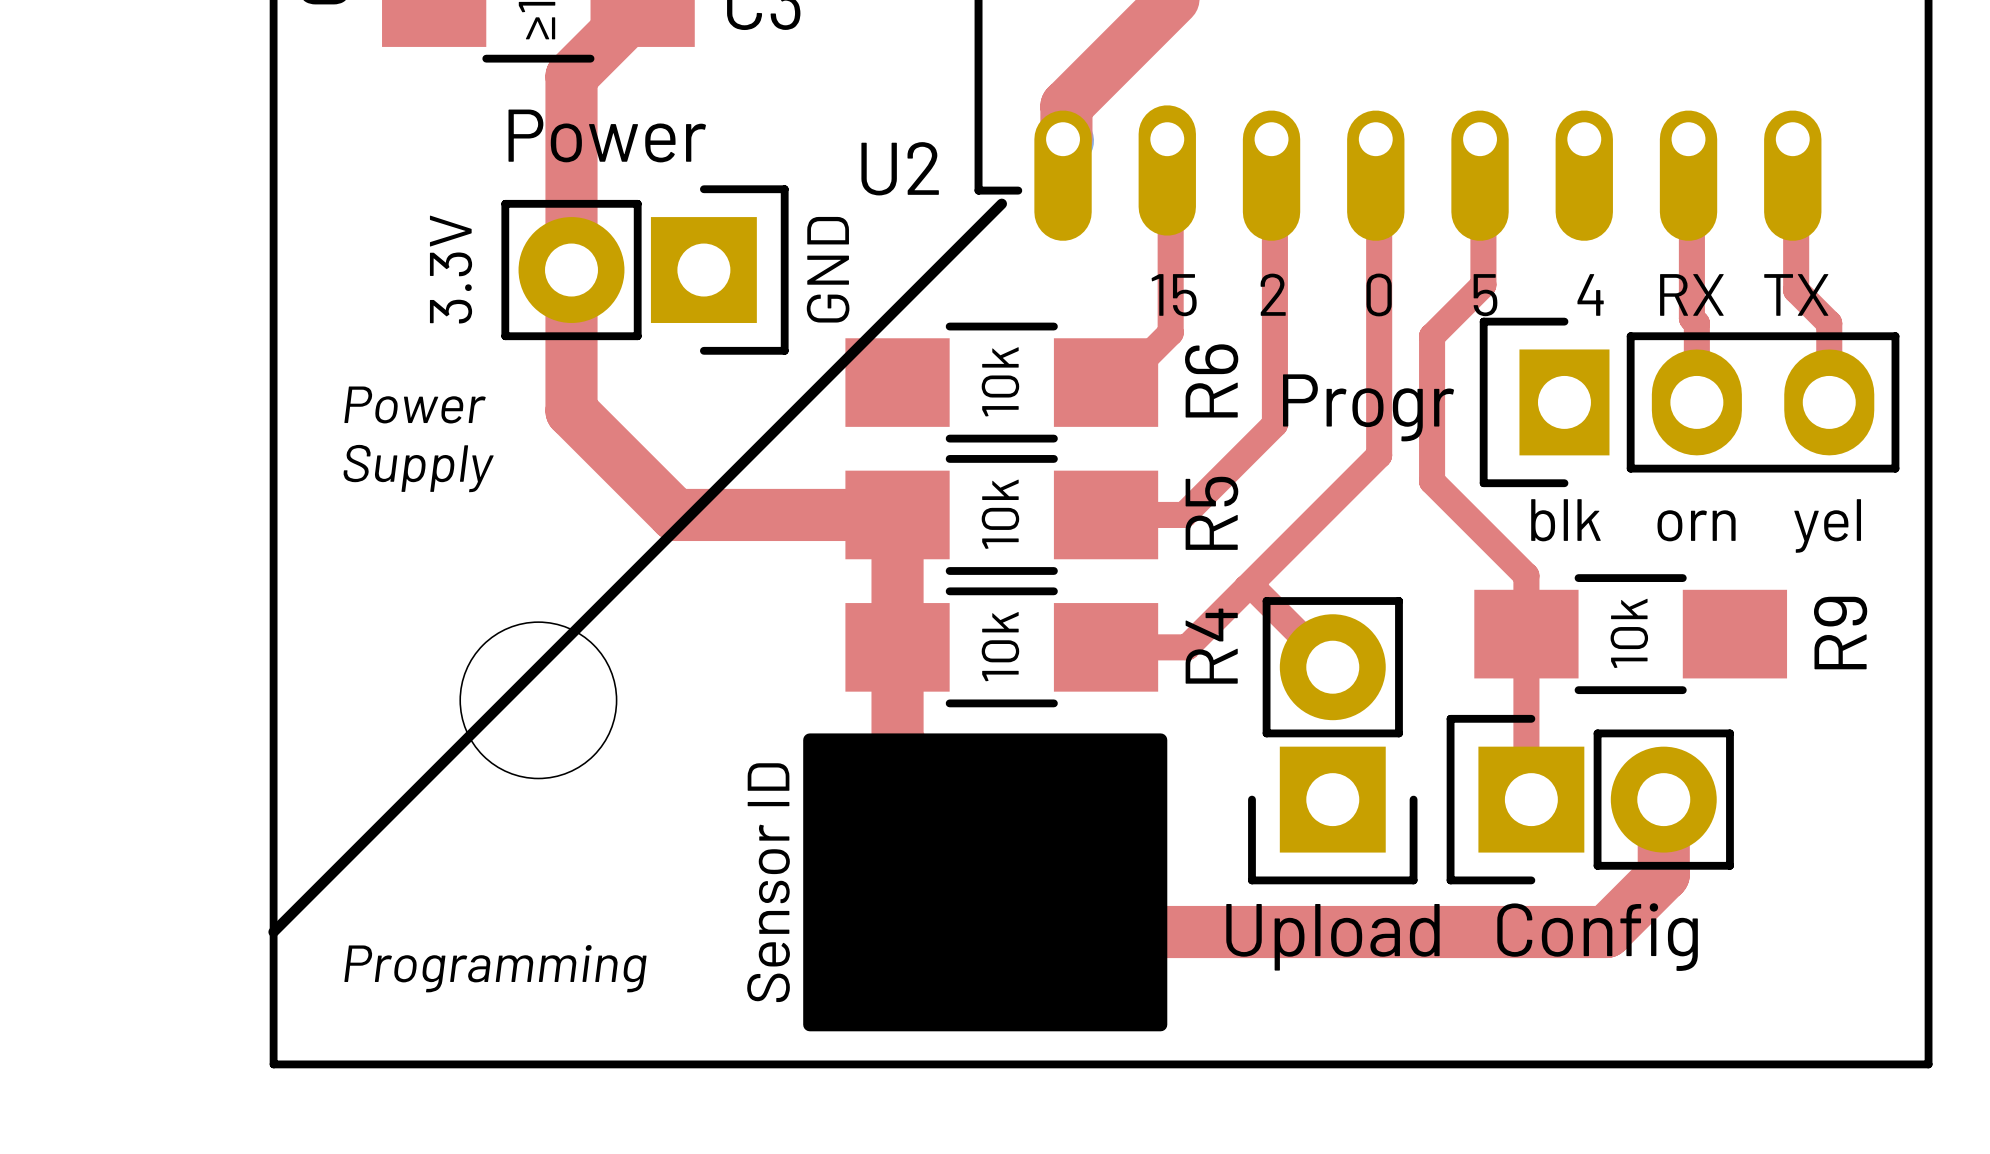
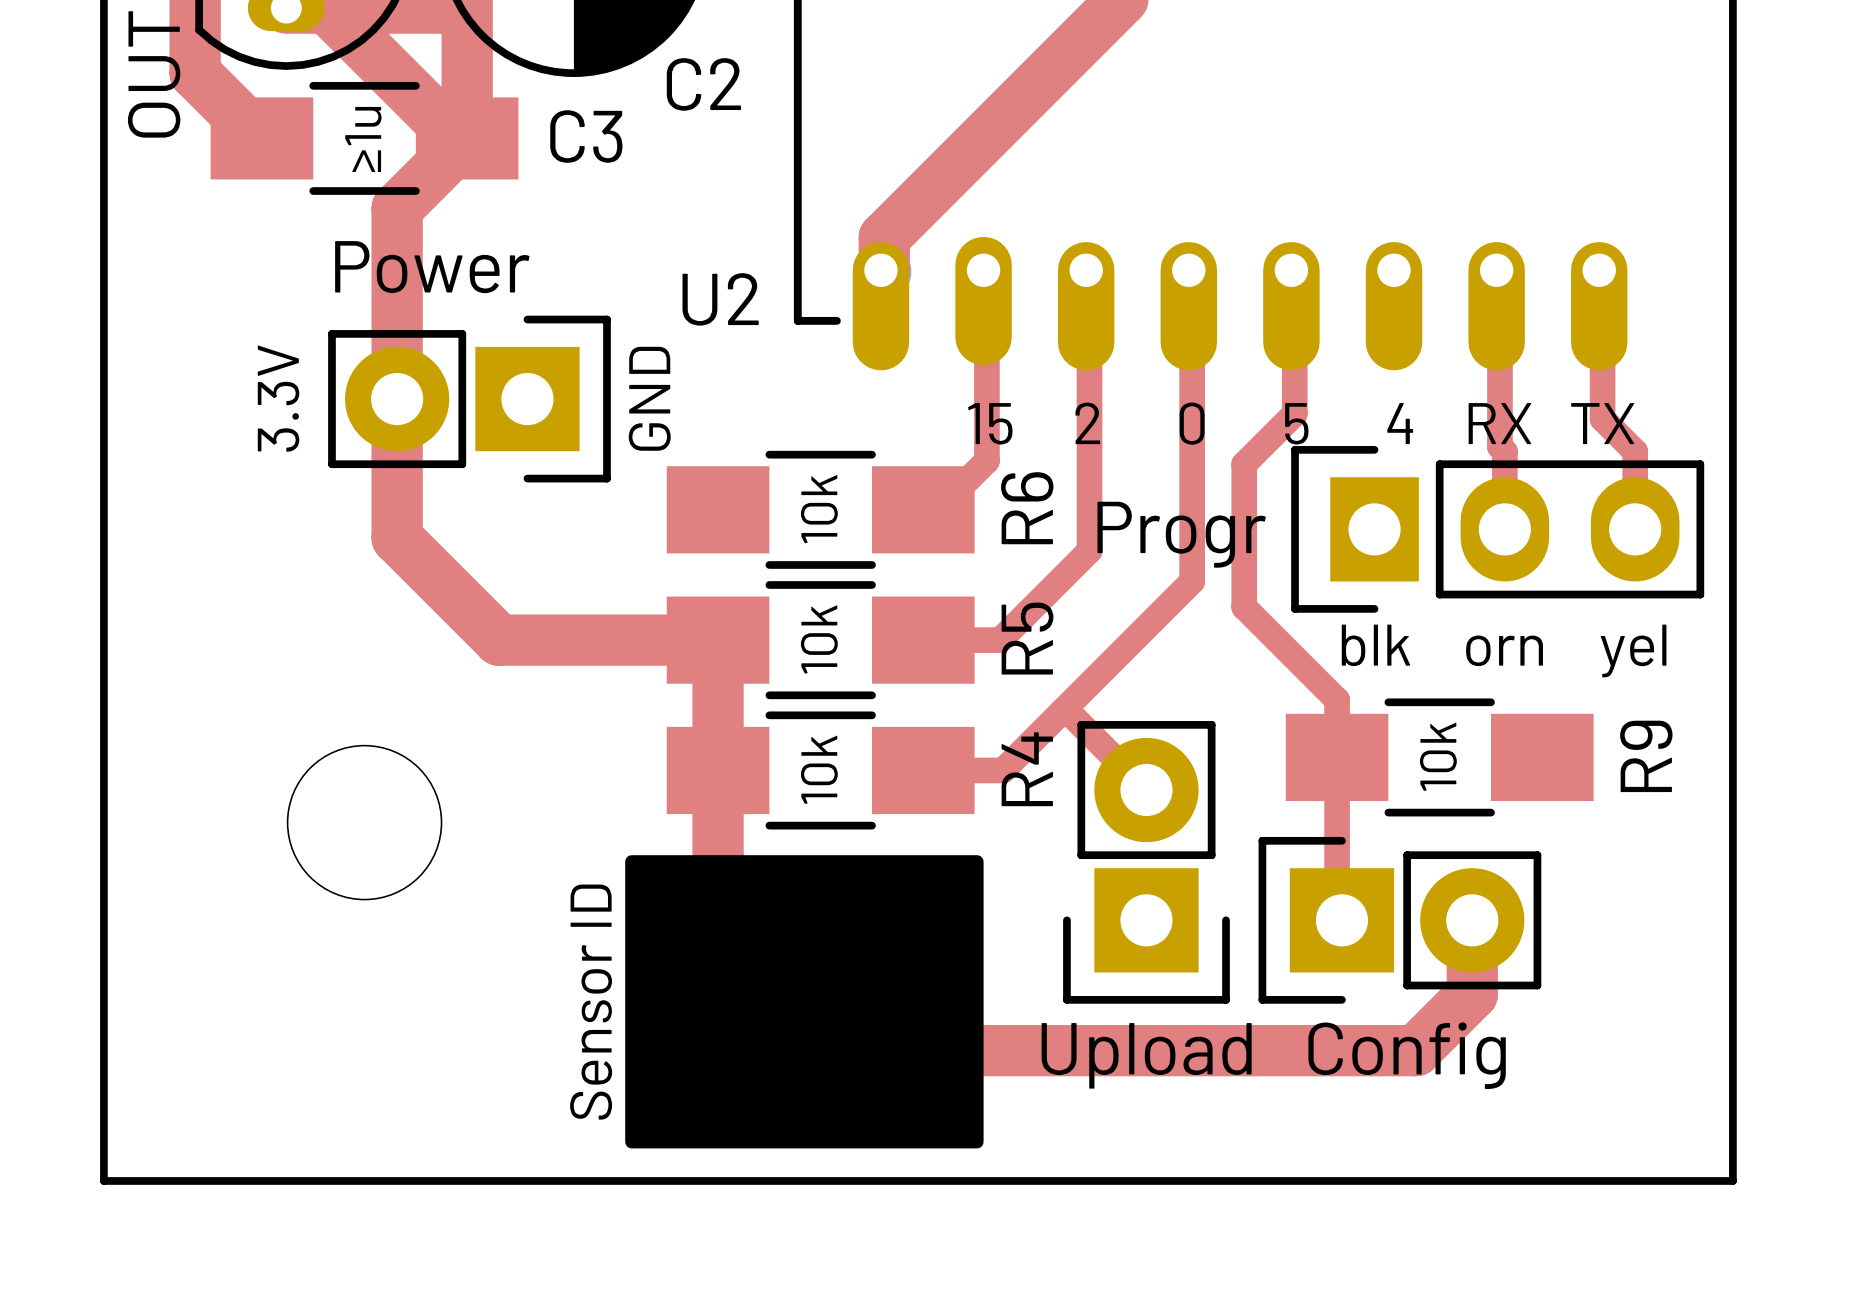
line: (1001, 203) (273, 932) -> none
text: Power (415, 405) -> none
text: Supply (418, 468) -> none
text: Programming (495, 968) -> none

